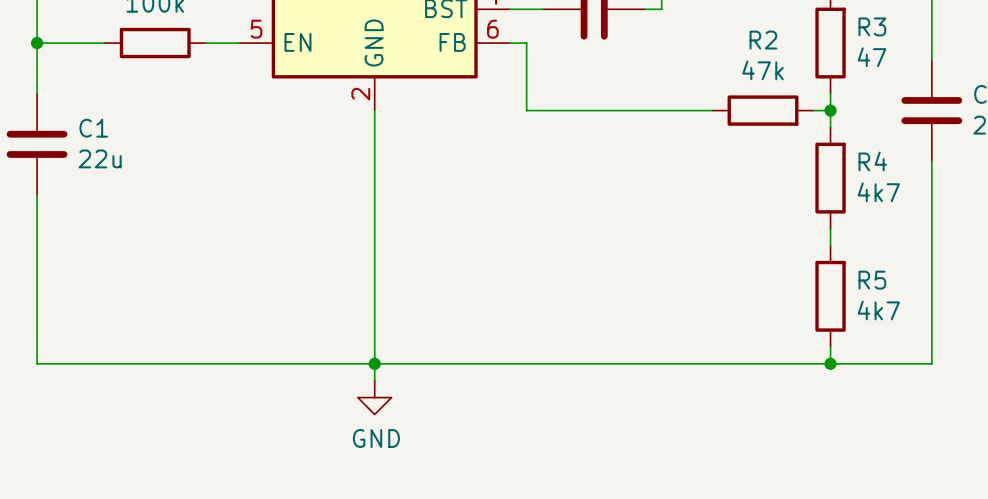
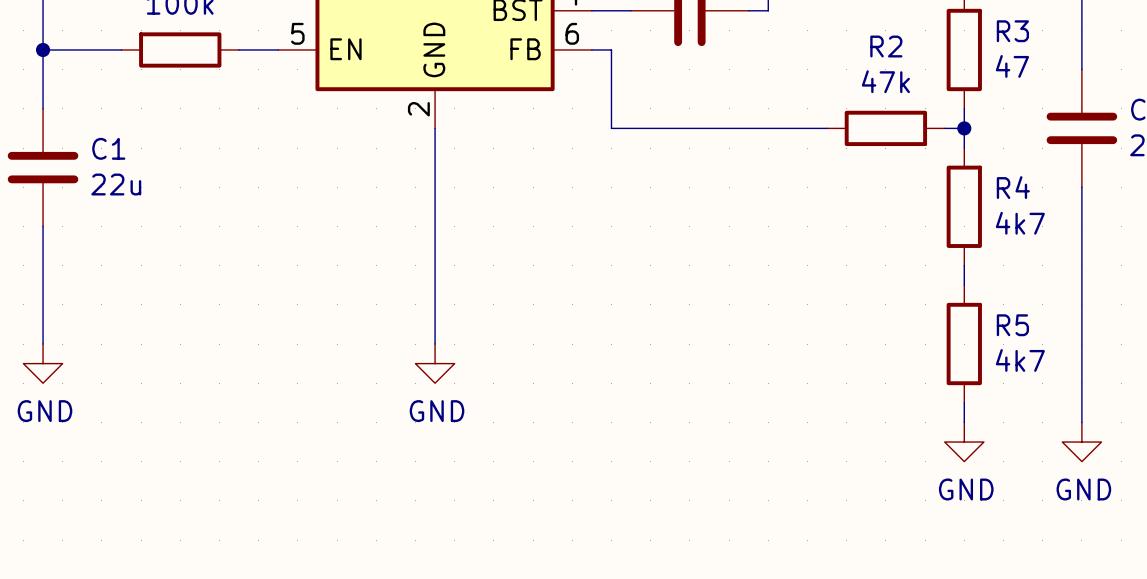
wire: (37, 296) (37, 363) (931, 363) -> none
wire: (374, 296) (374, 380) -> none
power symbol: none -> GND (43, 363)
junction: (374, 363) -> none
junction: (830, 363) -> none
power symbol: none -> GND (964, 442)
power symbol: none -> GND (1081, 442)
power symbol position: GND (374, 397) -> GND (435, 363)

